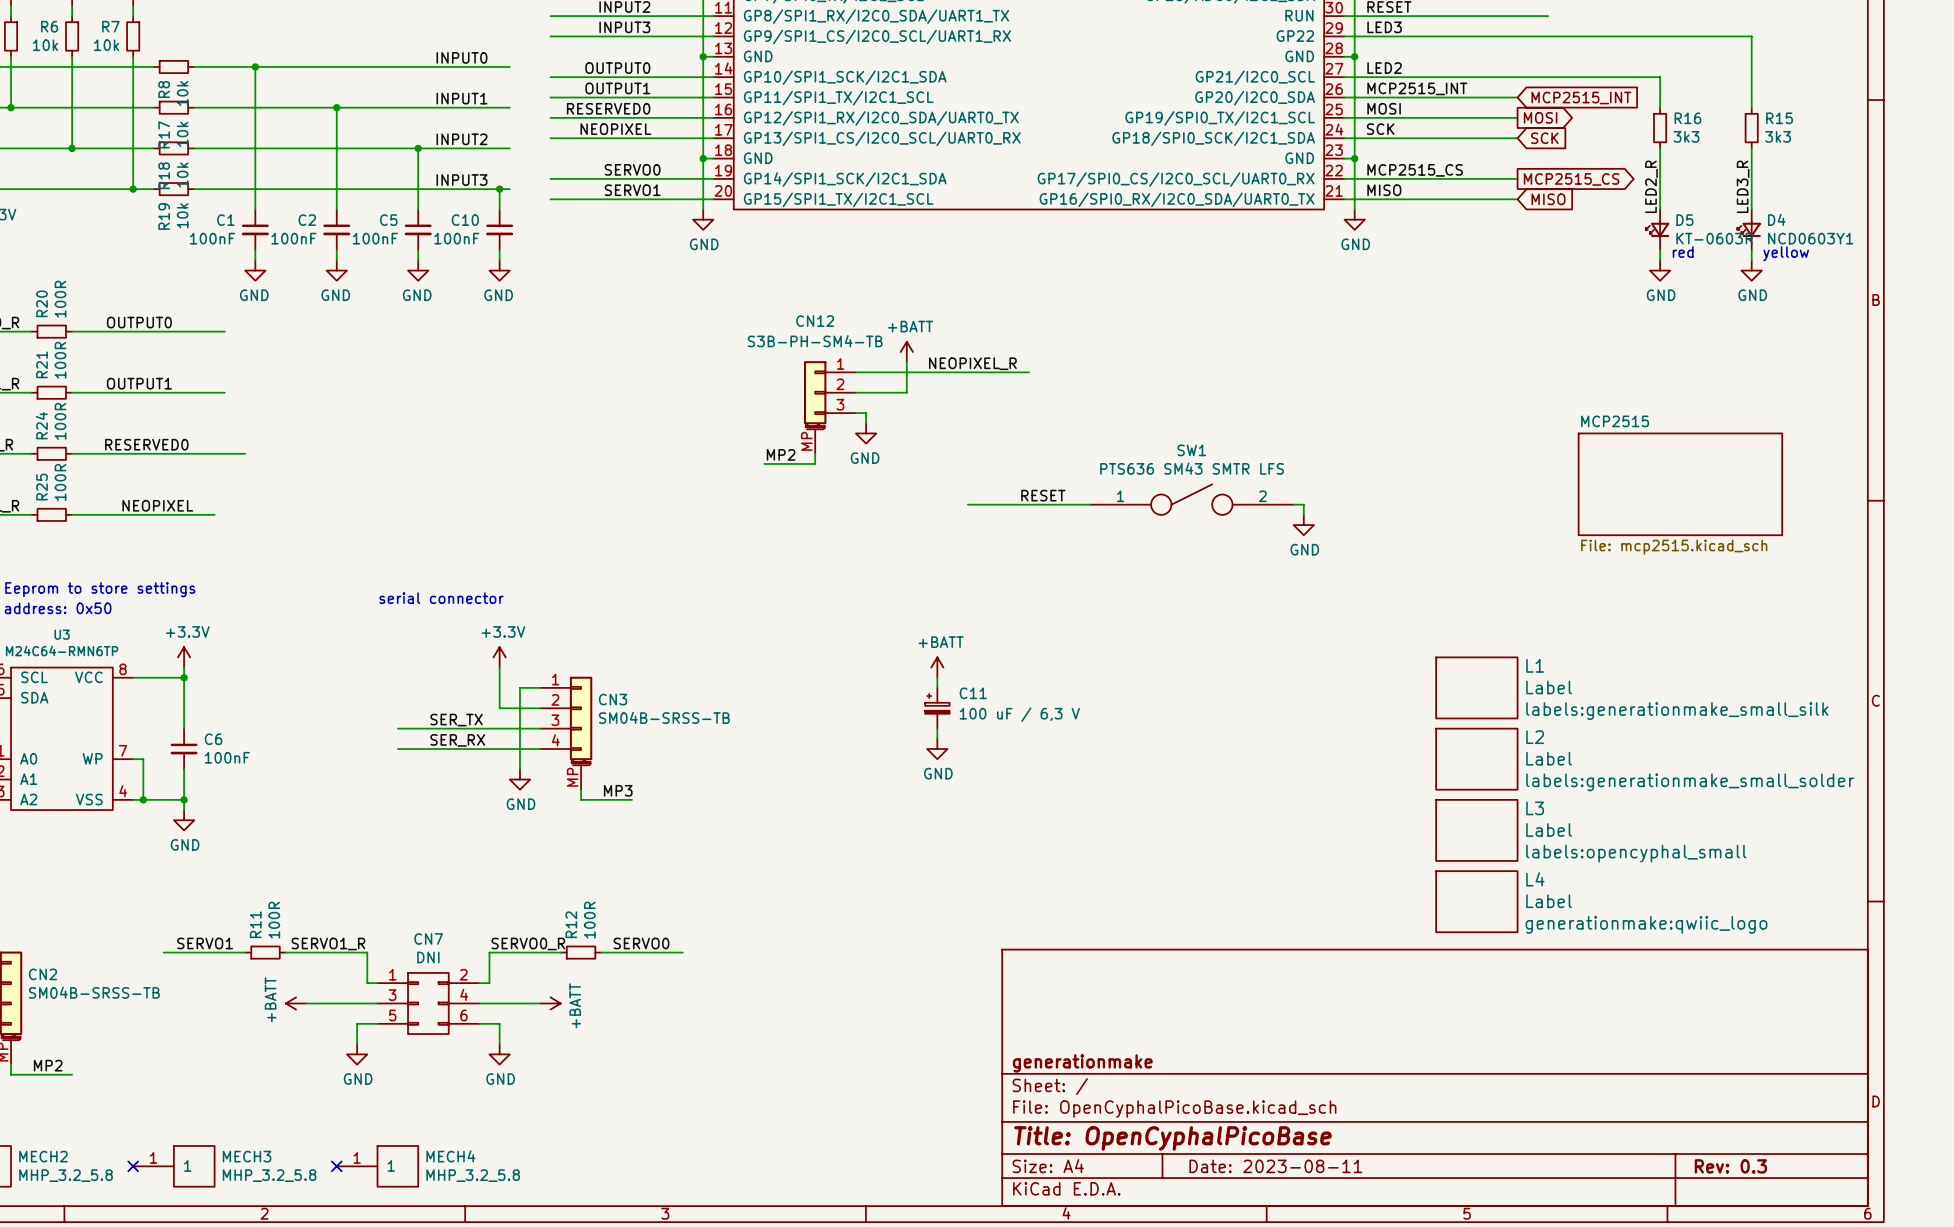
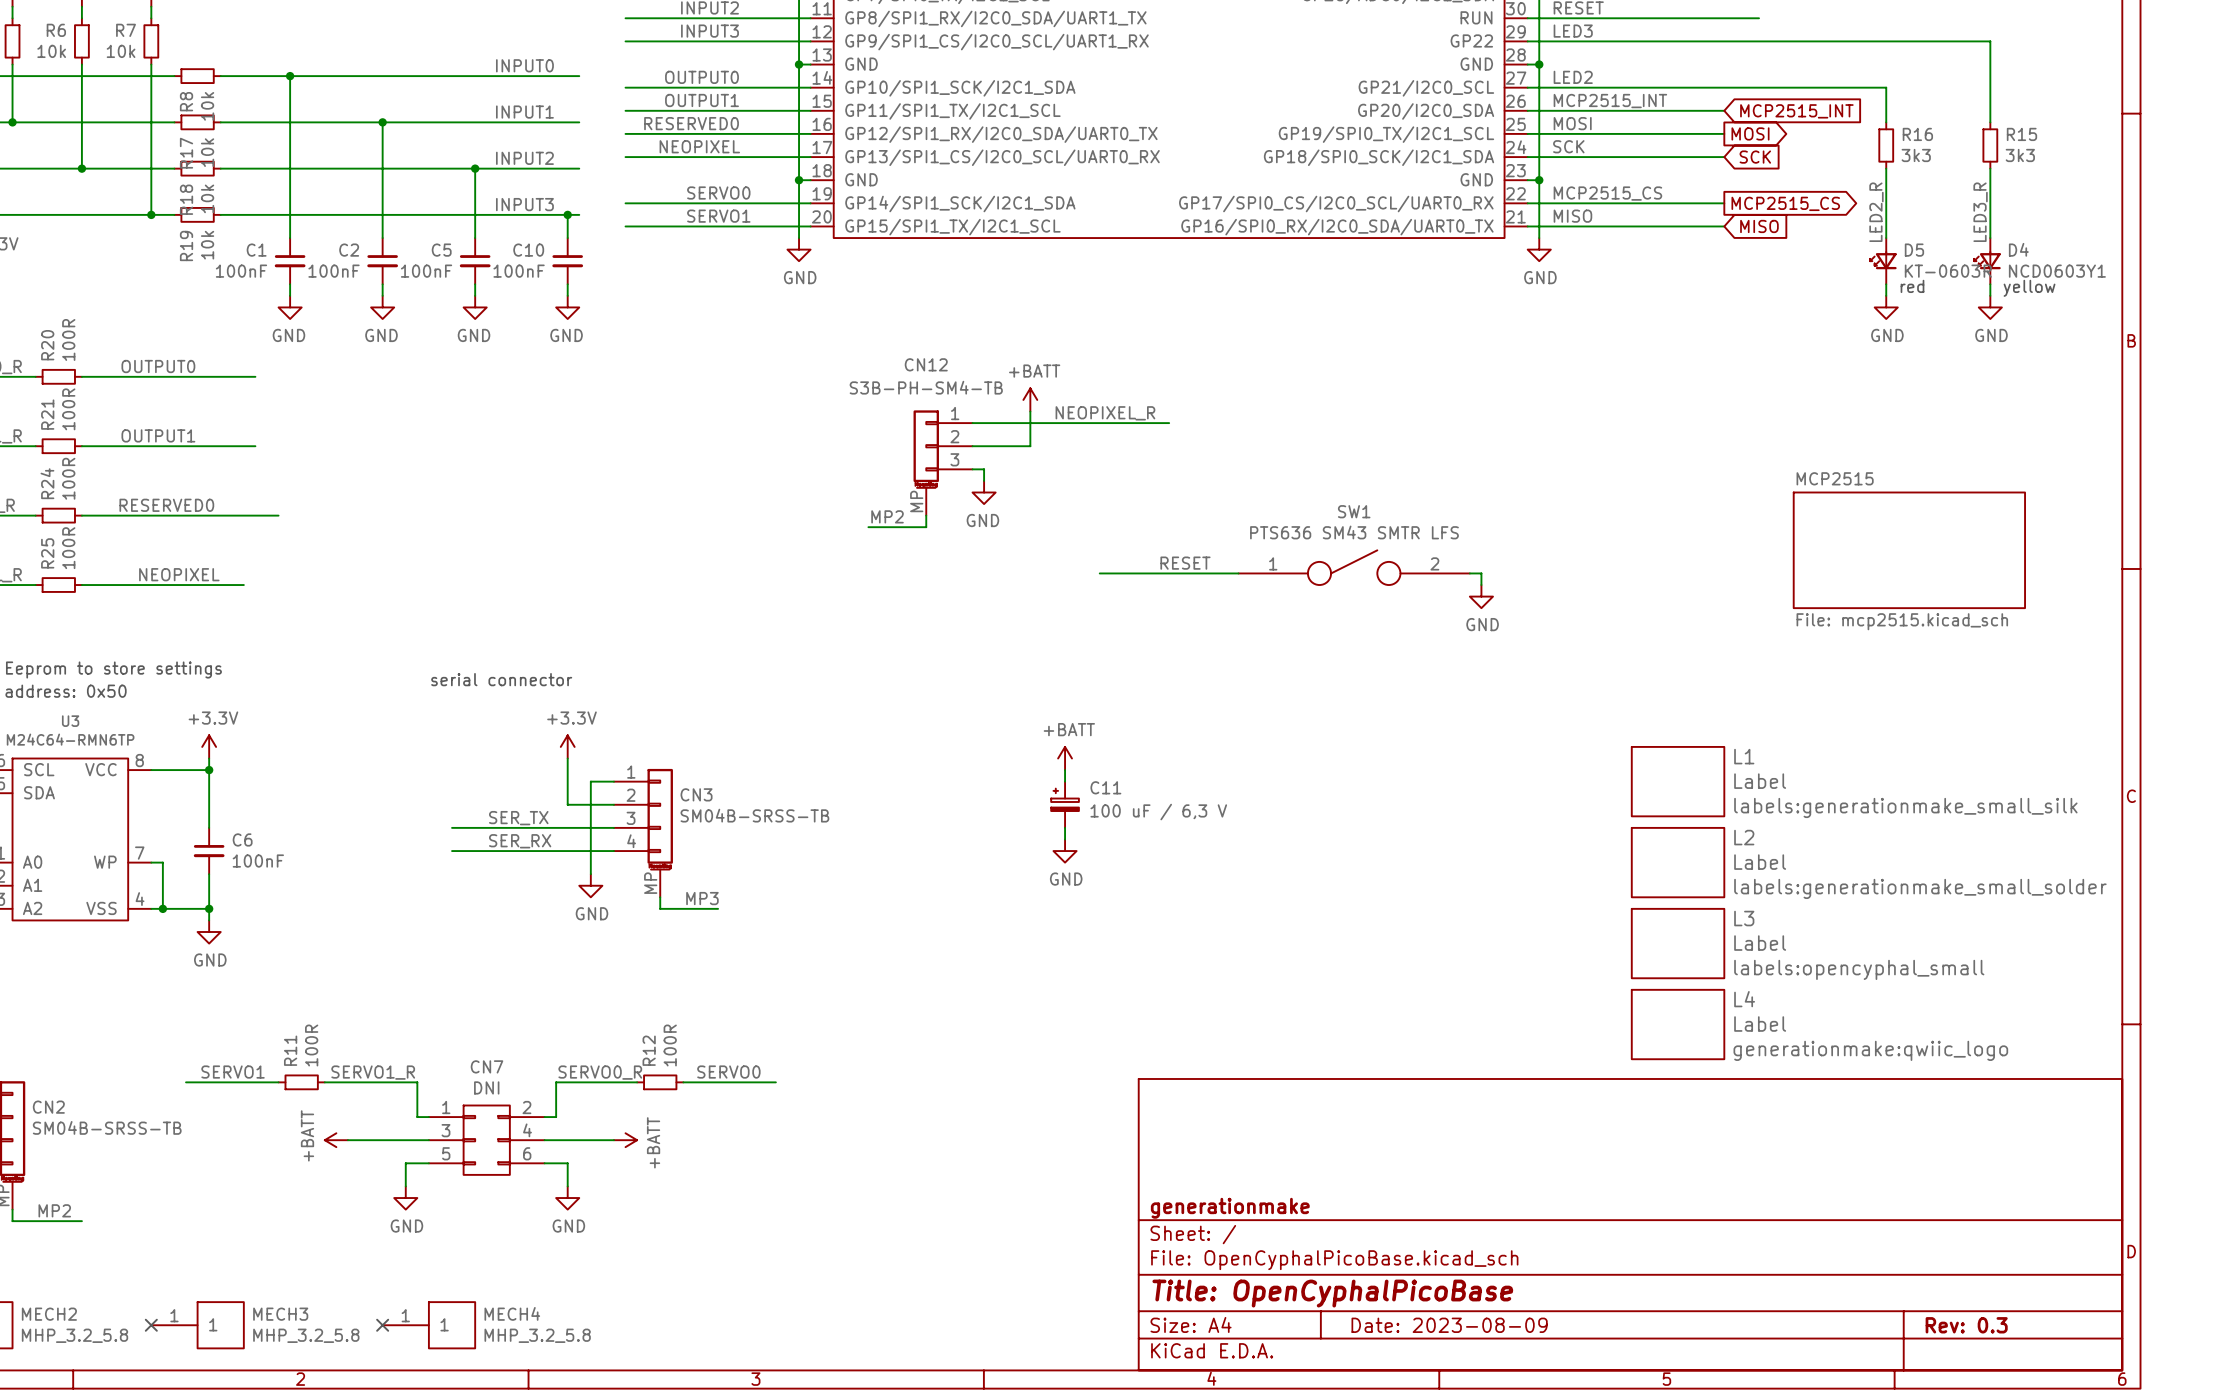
title block: Date: 2023-08-11 (1275, 1166) -> Date: 2023-08-09 (1449, 1325)

